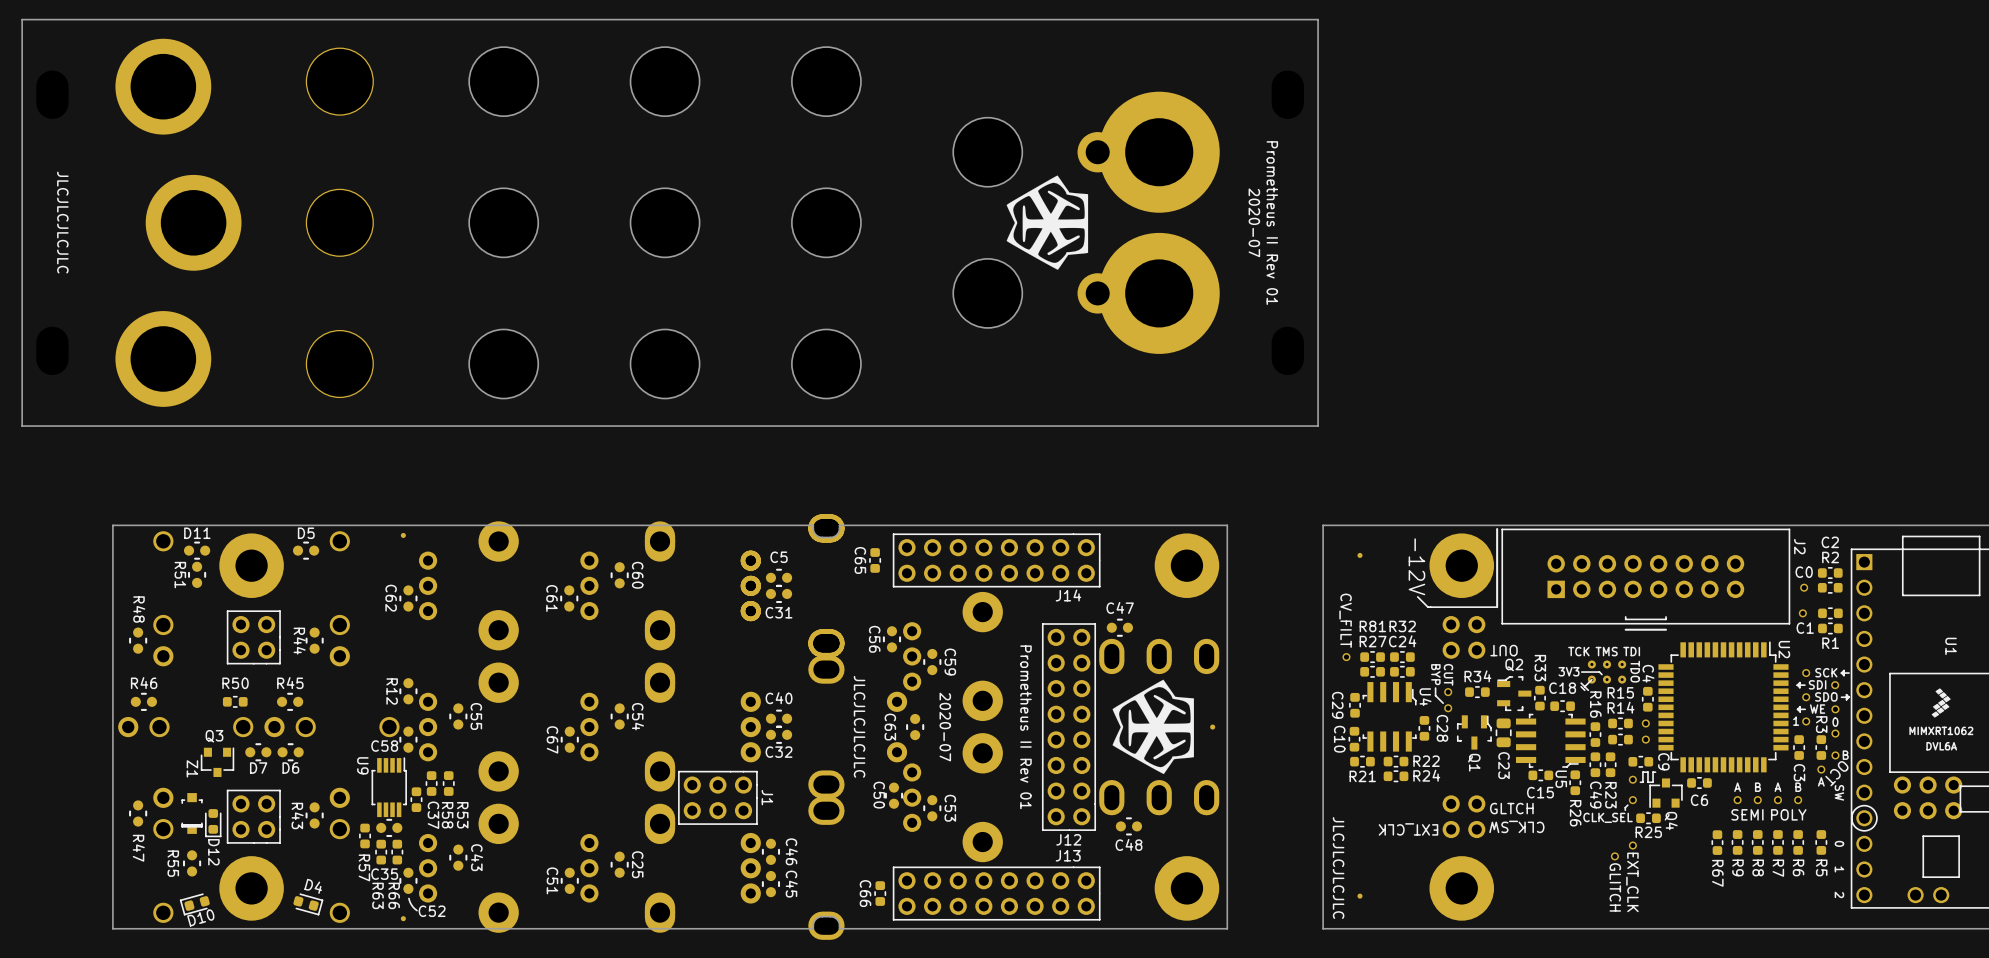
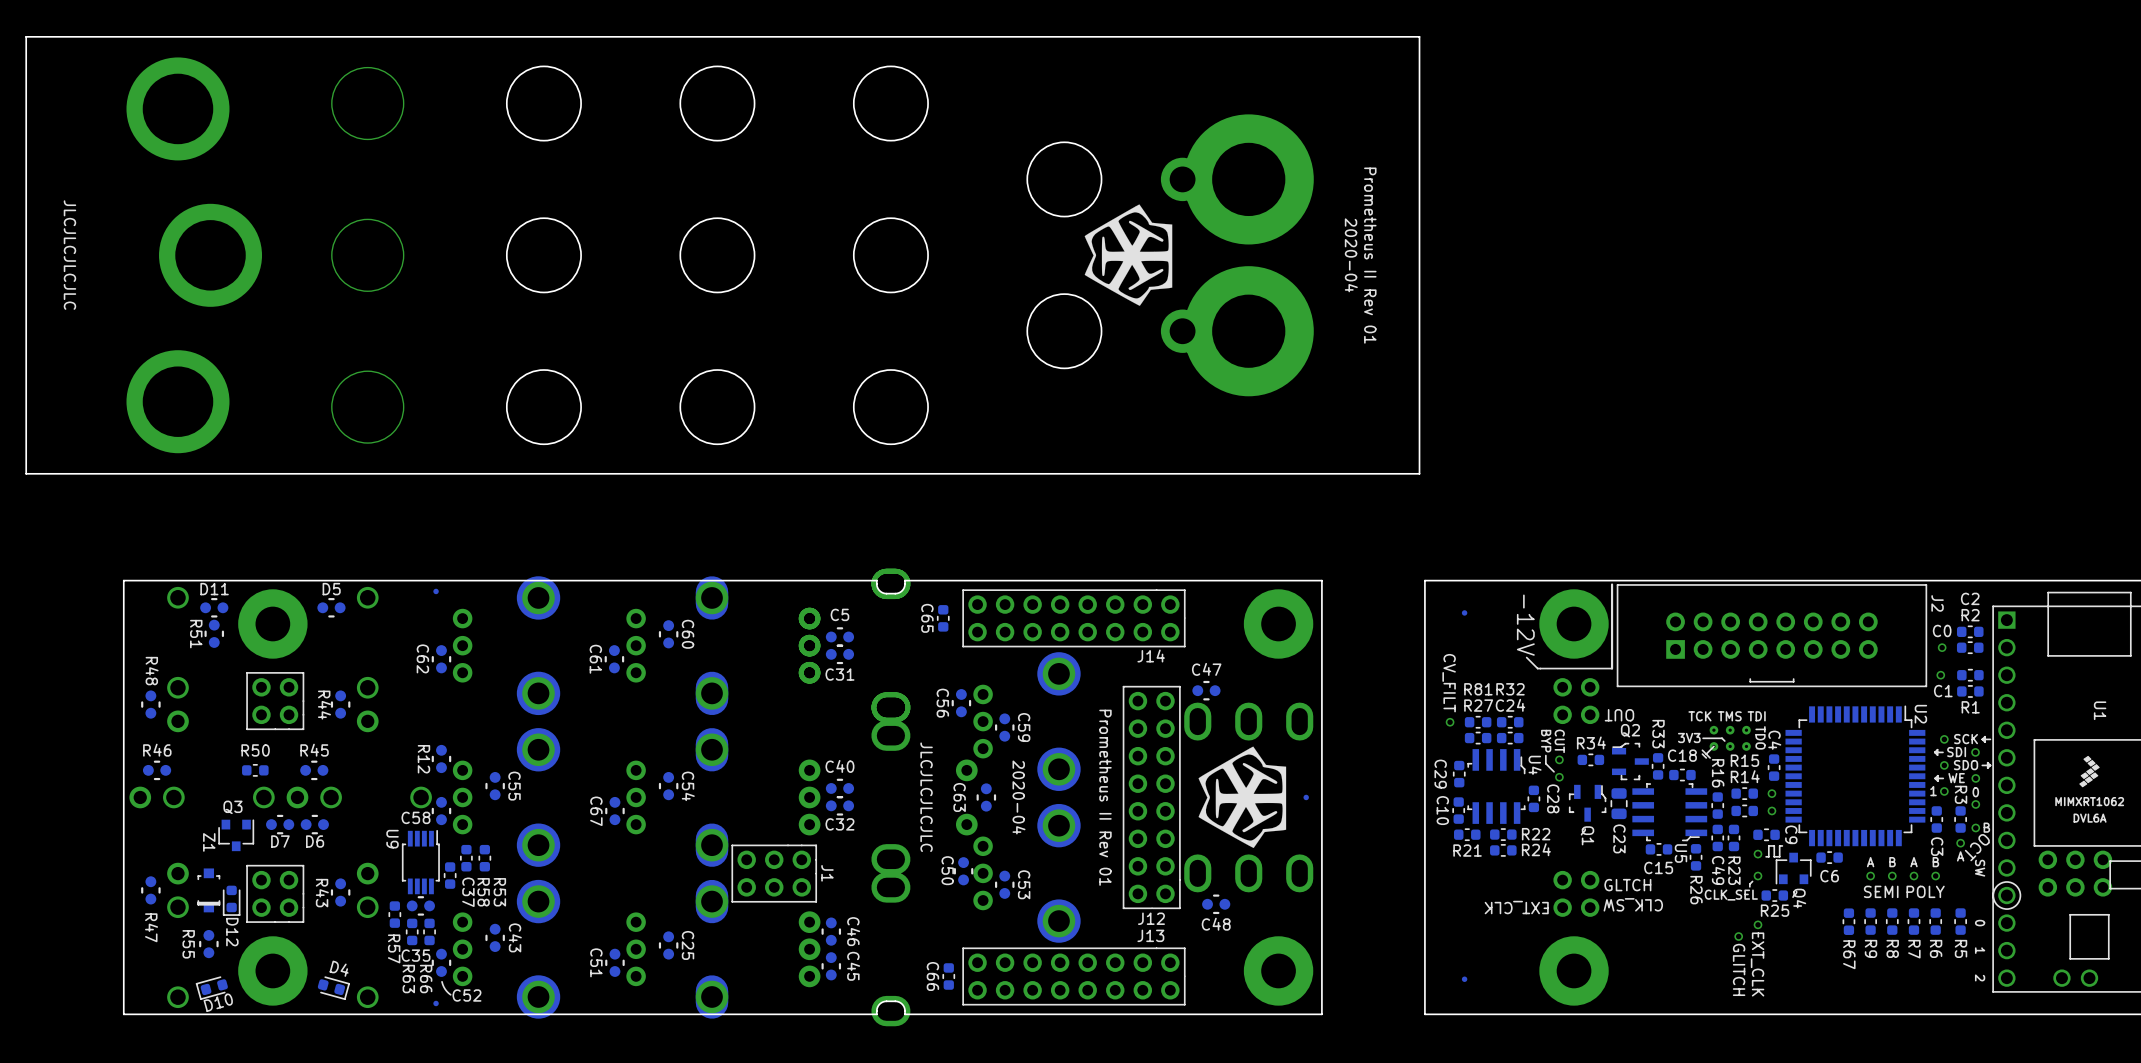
text: 2020-07 (1254, 222) -> 2020-04 (1351, 255)
line: (1666, 629) (1625, 629) -> none
text: 2020-07 (945, 727) -> 2020-04 (1018, 797)
text: JLCJLCJLCJLC (1338, 868) -> none

